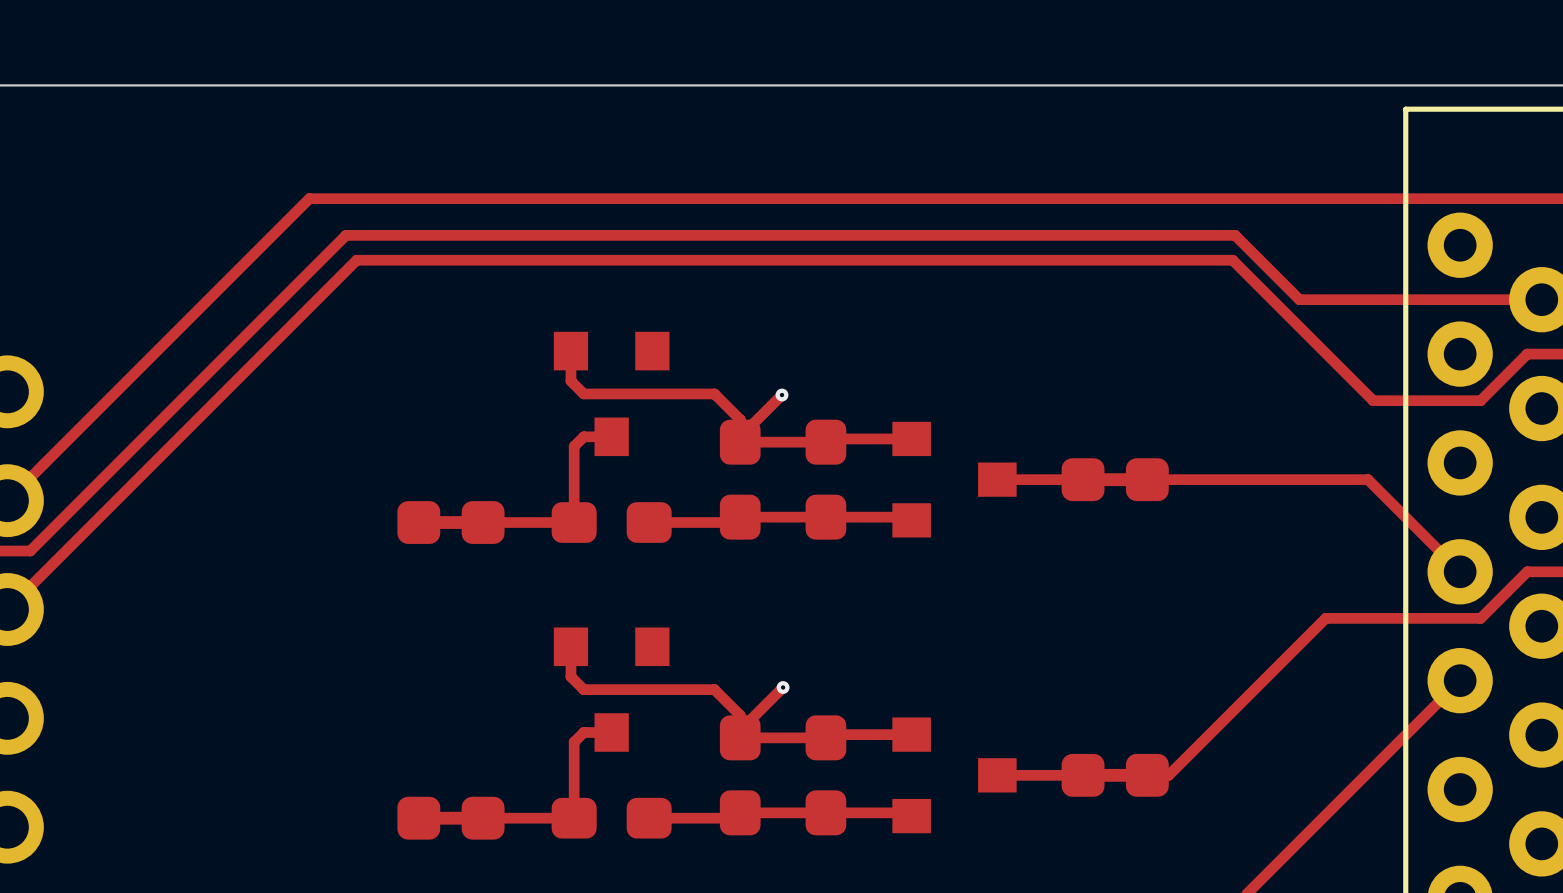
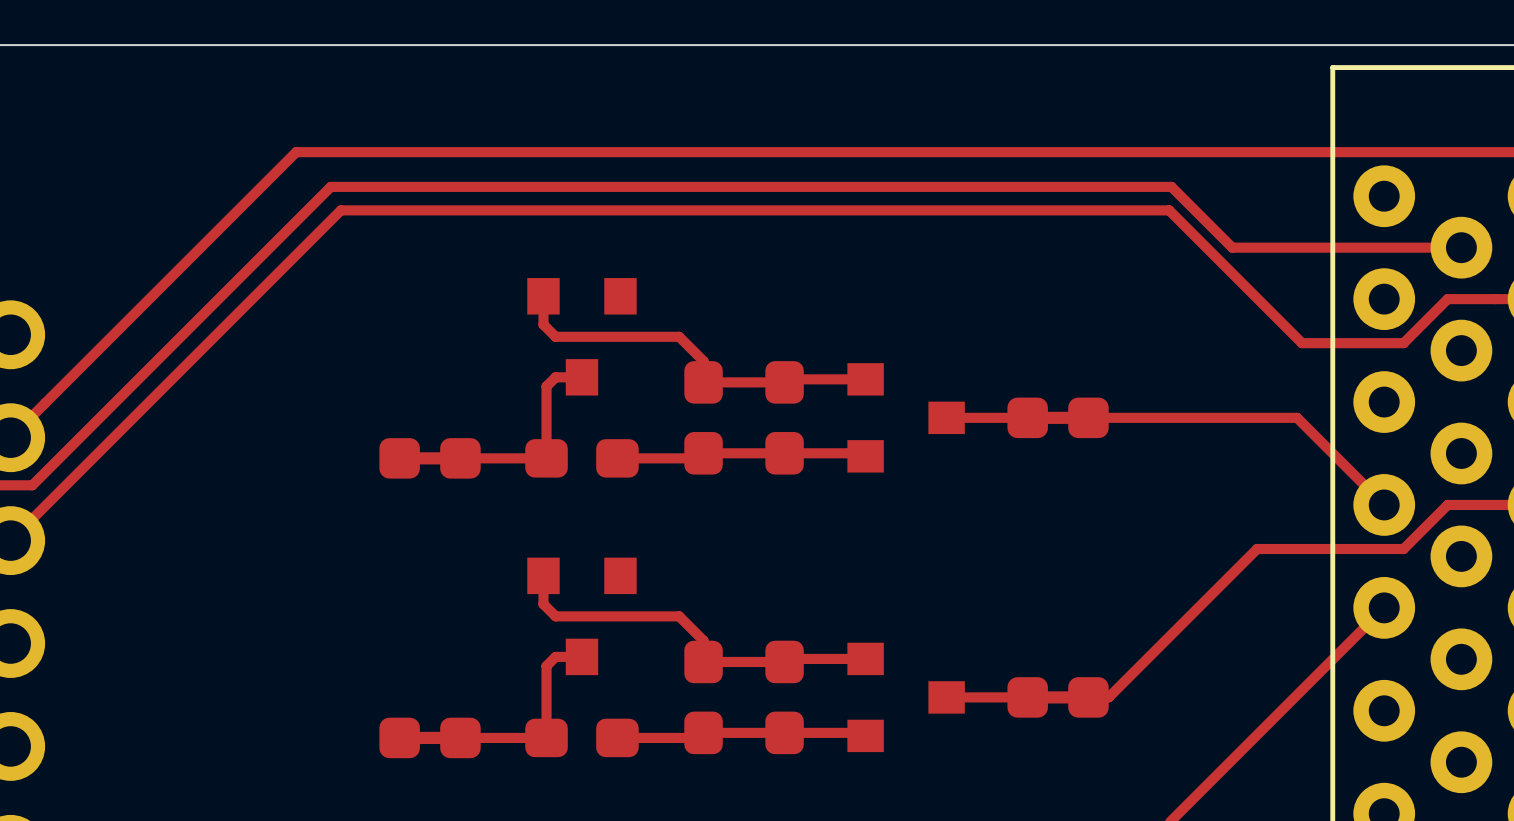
top track: (782, 395) (740, 436) -> none
via: (782, 395) -> none
top track: (783, 687) (740, 730) -> none
via: (783, 687) -> none

